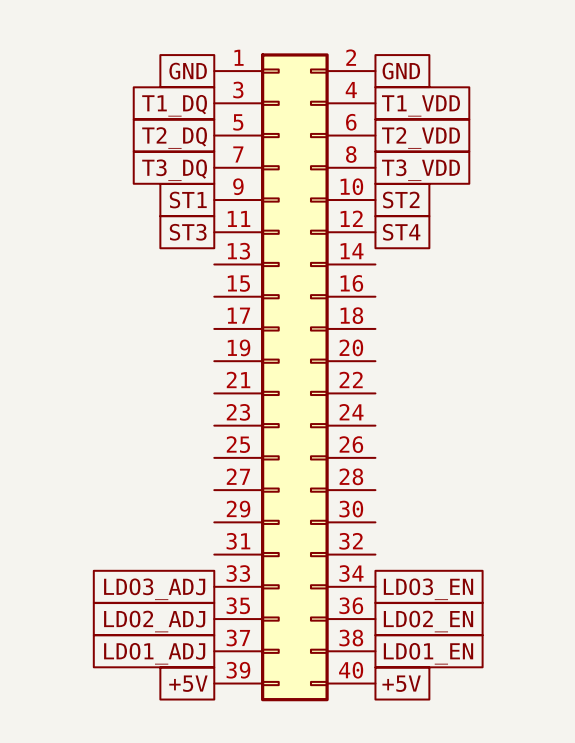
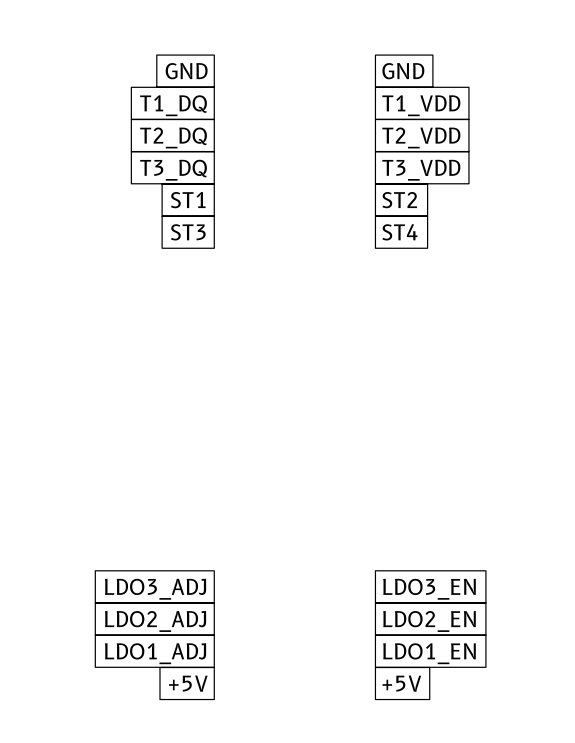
part: (294, 377) -> none

